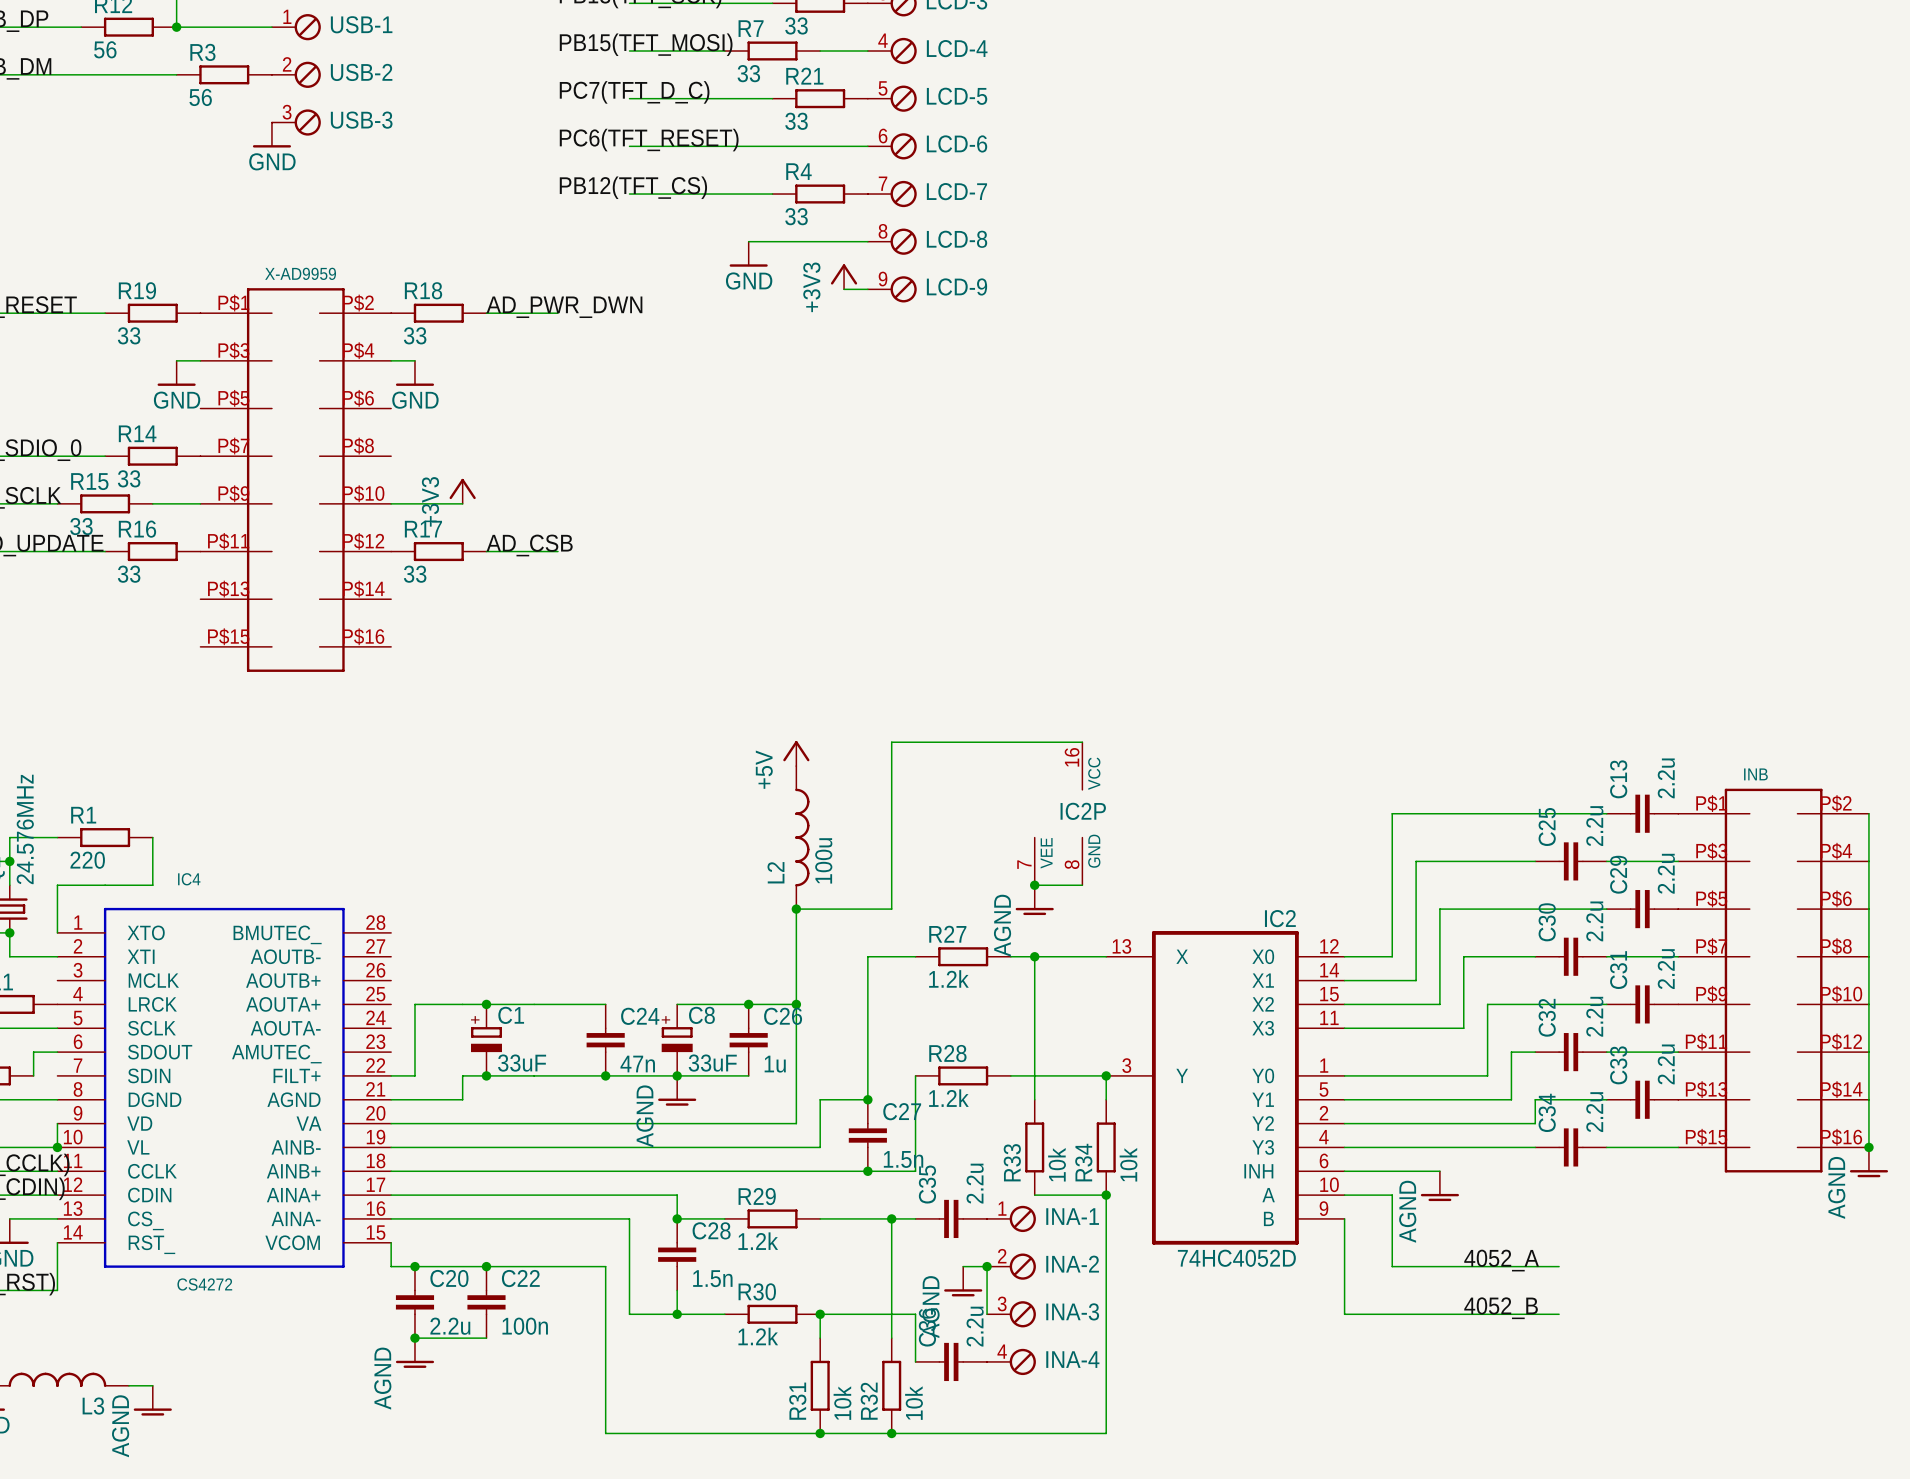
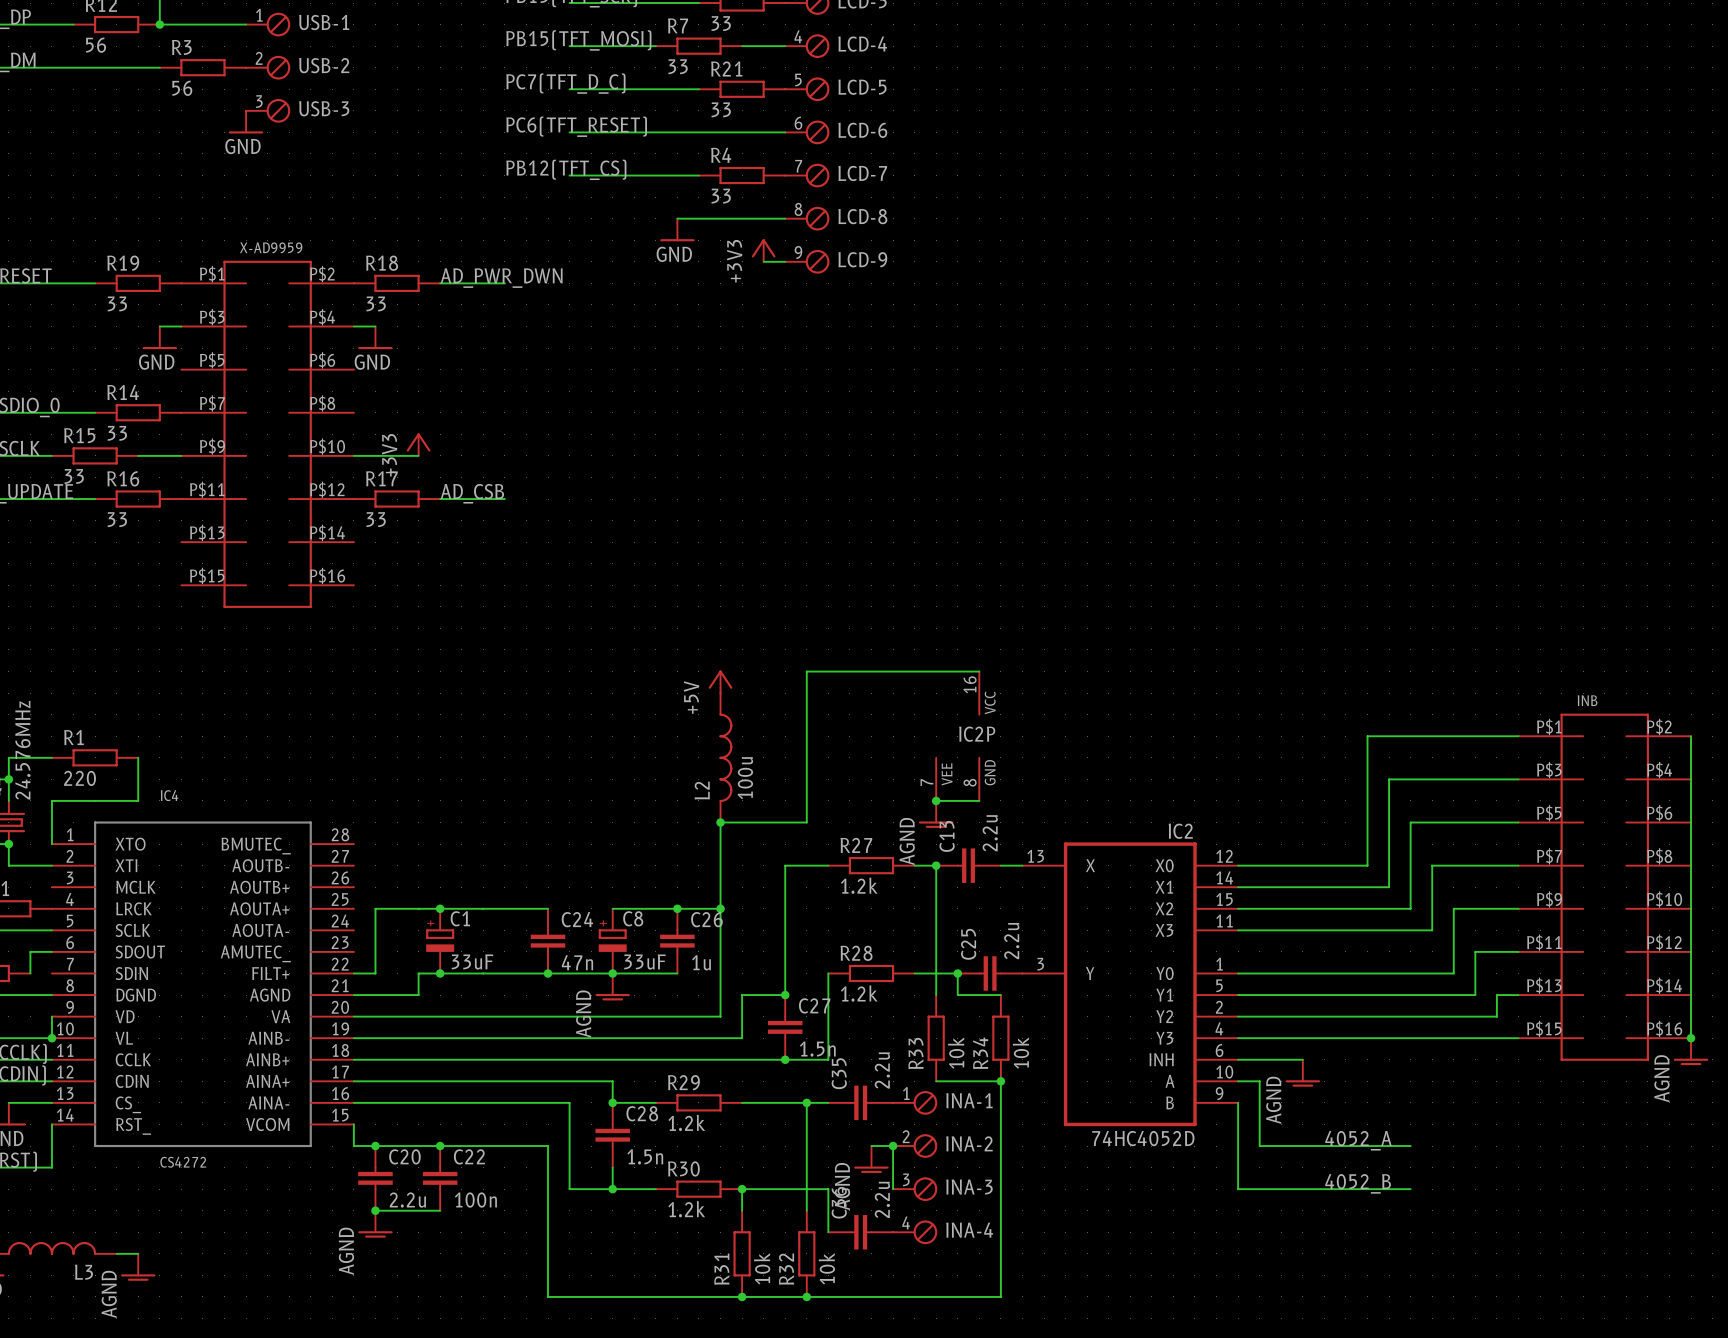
wire: (1511, 813) (1392, 813) (1392, 956) -> (1367, 736) (1367, 865)
C13 position: (1642, 813) -> (968, 865)
wire: (1535, 861) (1416, 861) (1416, 980) -> (1453, 779) (1389, 779) (1389, 887) (1281, 887)
C25 position: (1571, 861) -> (990, 973)
wire: (1559, 909) (1439, 909) (1439, 1004) -> none
C29: 2.2u (1642, 909) -> none
wire: (1463, 956) (1463, 1028) -> (1324, 865) (1259, 865)
wire: (1511, 956) (1535, 956) -> none
C30: 2.2u (1571, 956) -> none
wire: none -> (1453, 865) (1432, 865) (1432, 930) (1324, 930)
wire: (1487, 1004) (1487, 1075) -> (1345, 908) (1302, 908)
wire: (1559, 1004) (1606, 1004) -> (1410, 908) (1410, 822)
C31: 2.2u (1642, 1004) -> none
wire: none -> (1518, 908) (1453, 908) (1453, 973) (1345, 973)
wire: (1535, 1052) (1511, 1052) (1511, 1099) -> none
C32: 2.2u (1571, 1052) -> none
wire: (1606, 1052) (1630, 1052) -> (1453, 995) (1475, 995) (1475, 951)
wire: (1058, 1075) (1106, 1075) (1106, 1099) -> (957, 973) (957, 995) (1000, 995)
junction position: (1106, 1075) -> (957, 973)
IC2 position: (1225, 1087) -> (1130, 984)
wire: (1535, 1099) (1535, 1123) -> (1389, 995) (1367, 995)
C33: 2.2u (1642, 1099) -> none
wire: none -> (1518, 995) (1496, 995) (1496, 1016) (1389, 1016)
C34: 2.2u (1571, 1147) -> none
wire: (1344, 1218) (1344, 1314) (1368, 1314) -> (1238, 1102) (1238, 1189)

